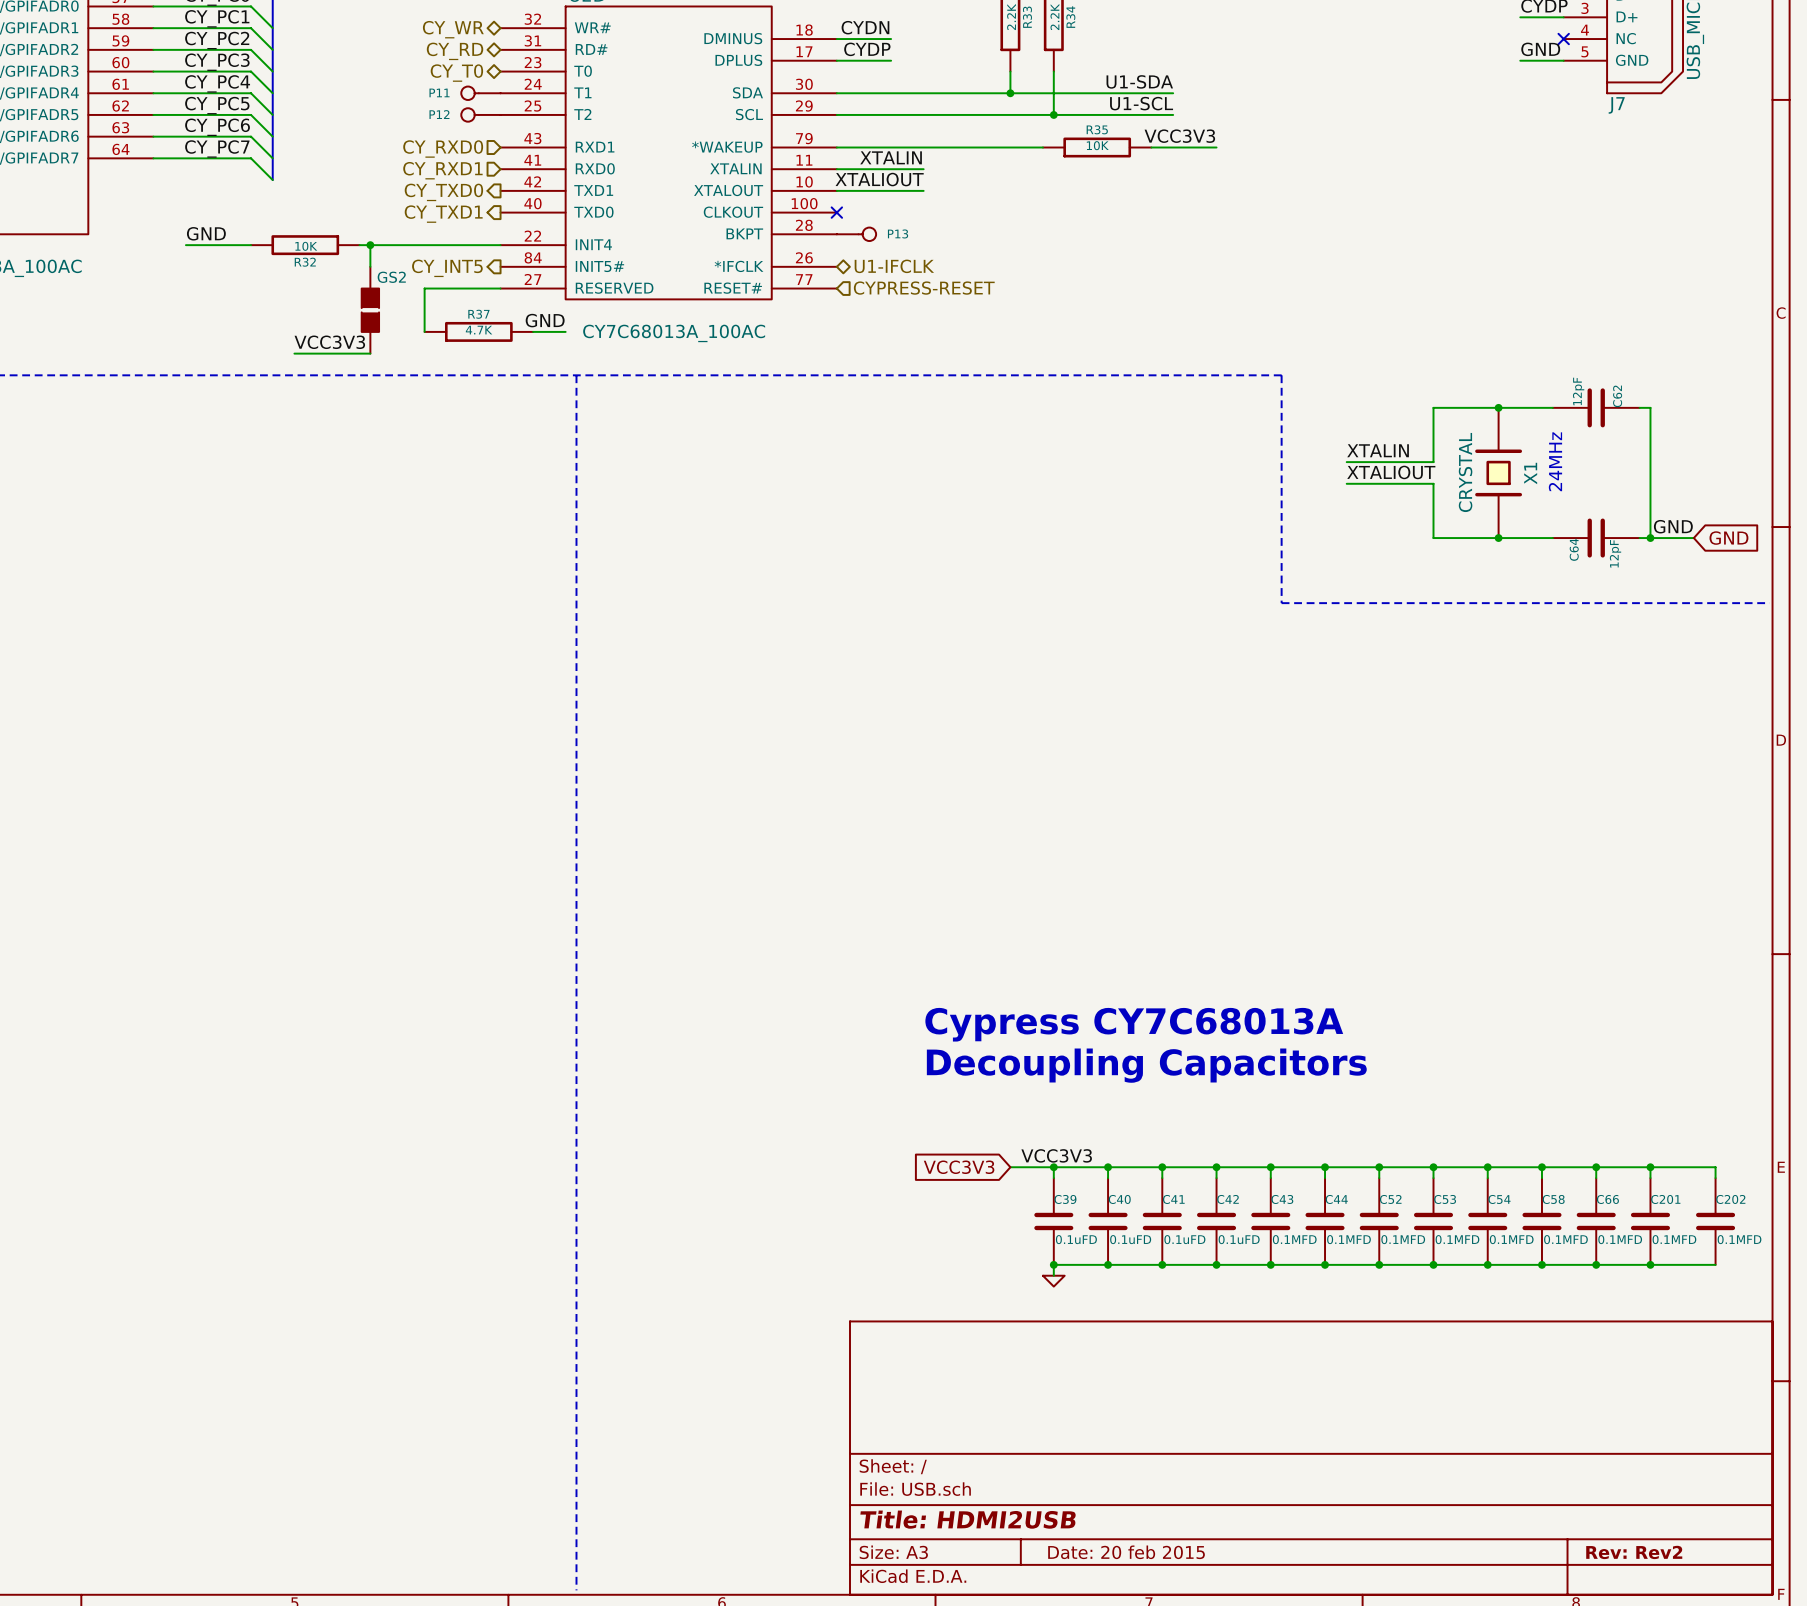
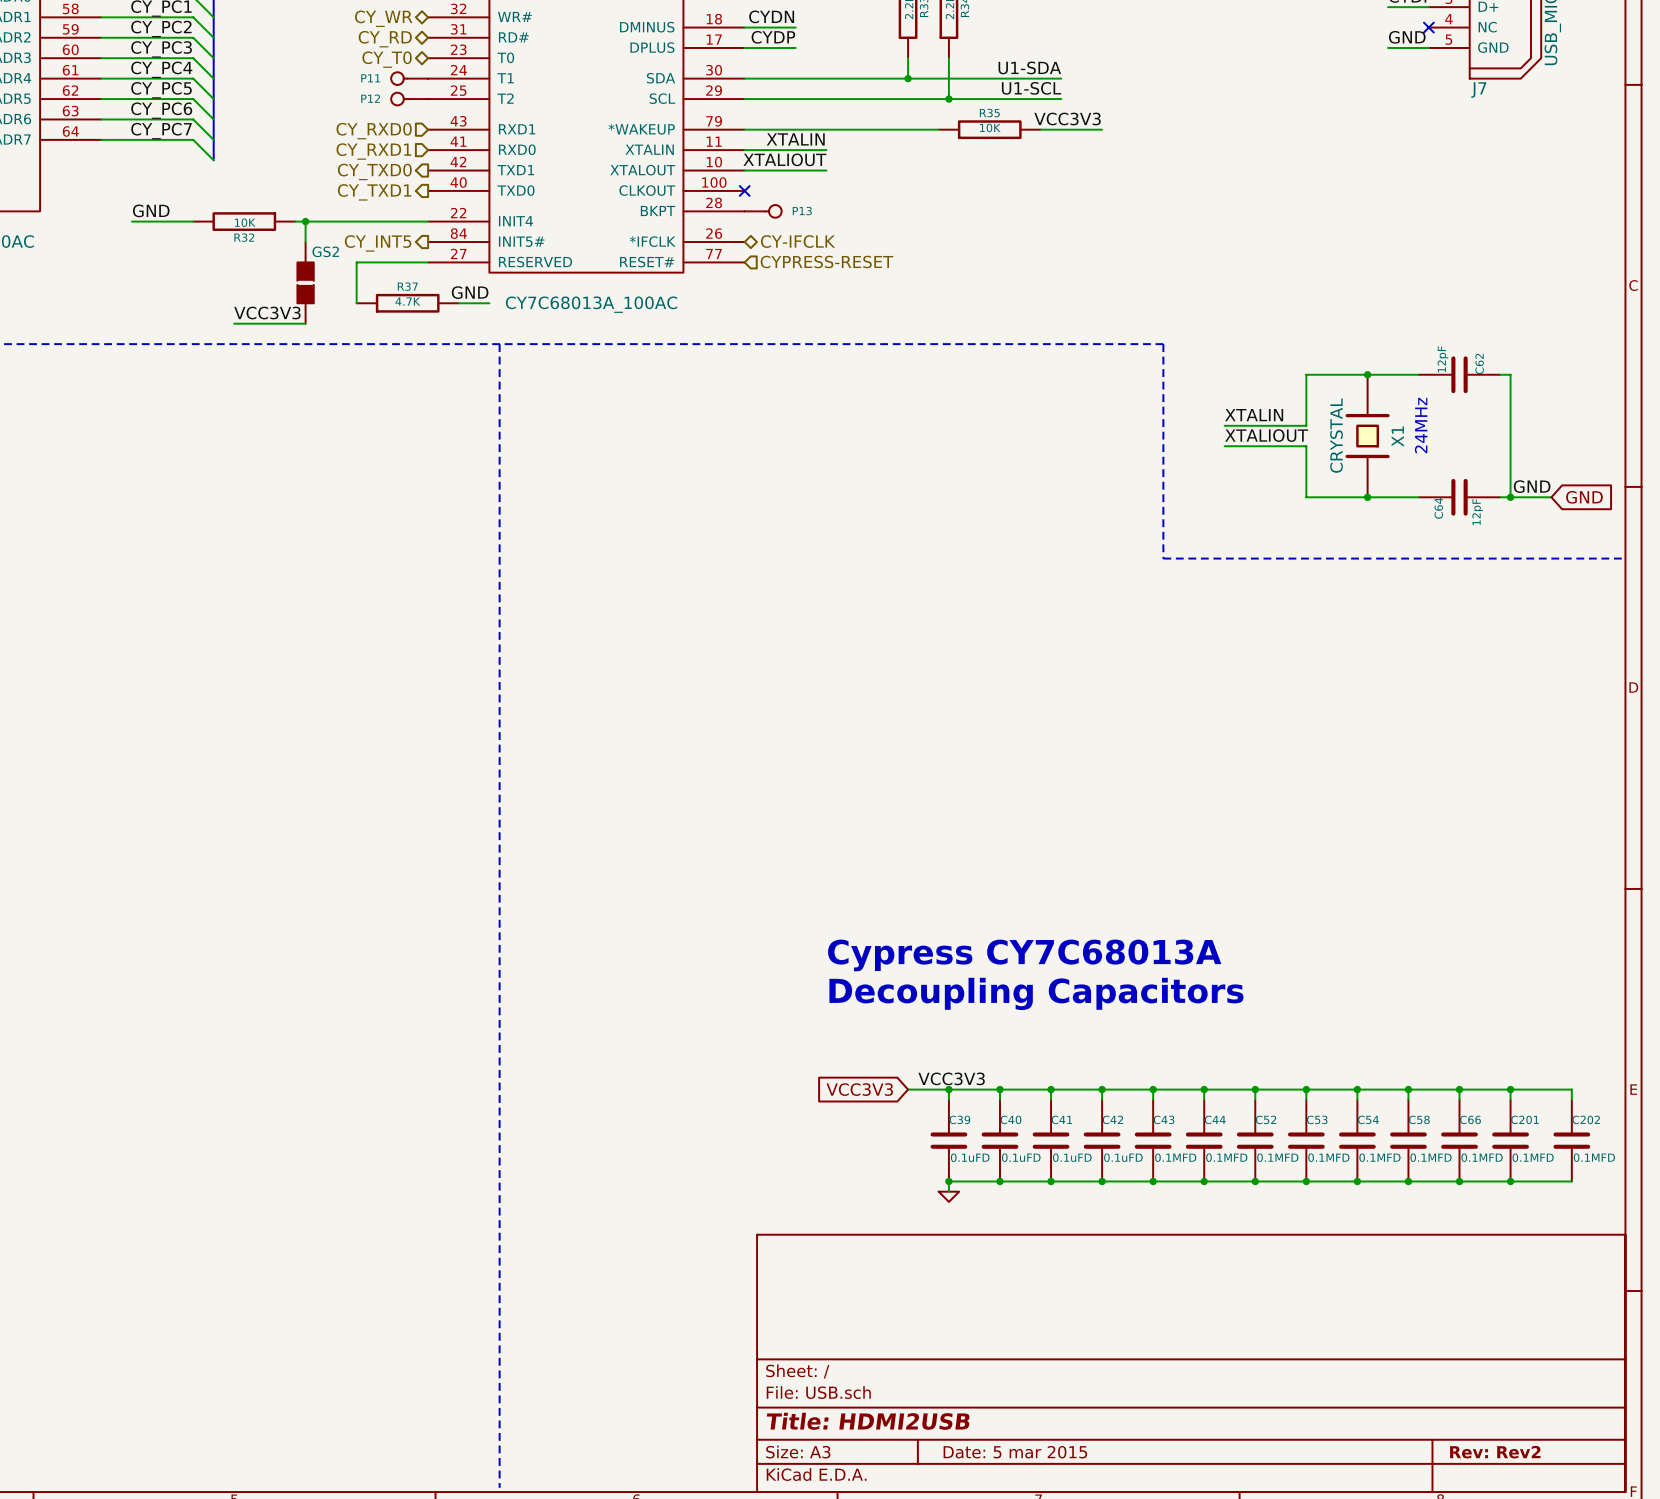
hierarchical label: U1-IFCLK (894, 266) -> CY-IFCLK (798, 241)
title block: Date: 20 feb 2015 (1126, 1552) -> Date: 5 mar 2015 (1015, 1452)

